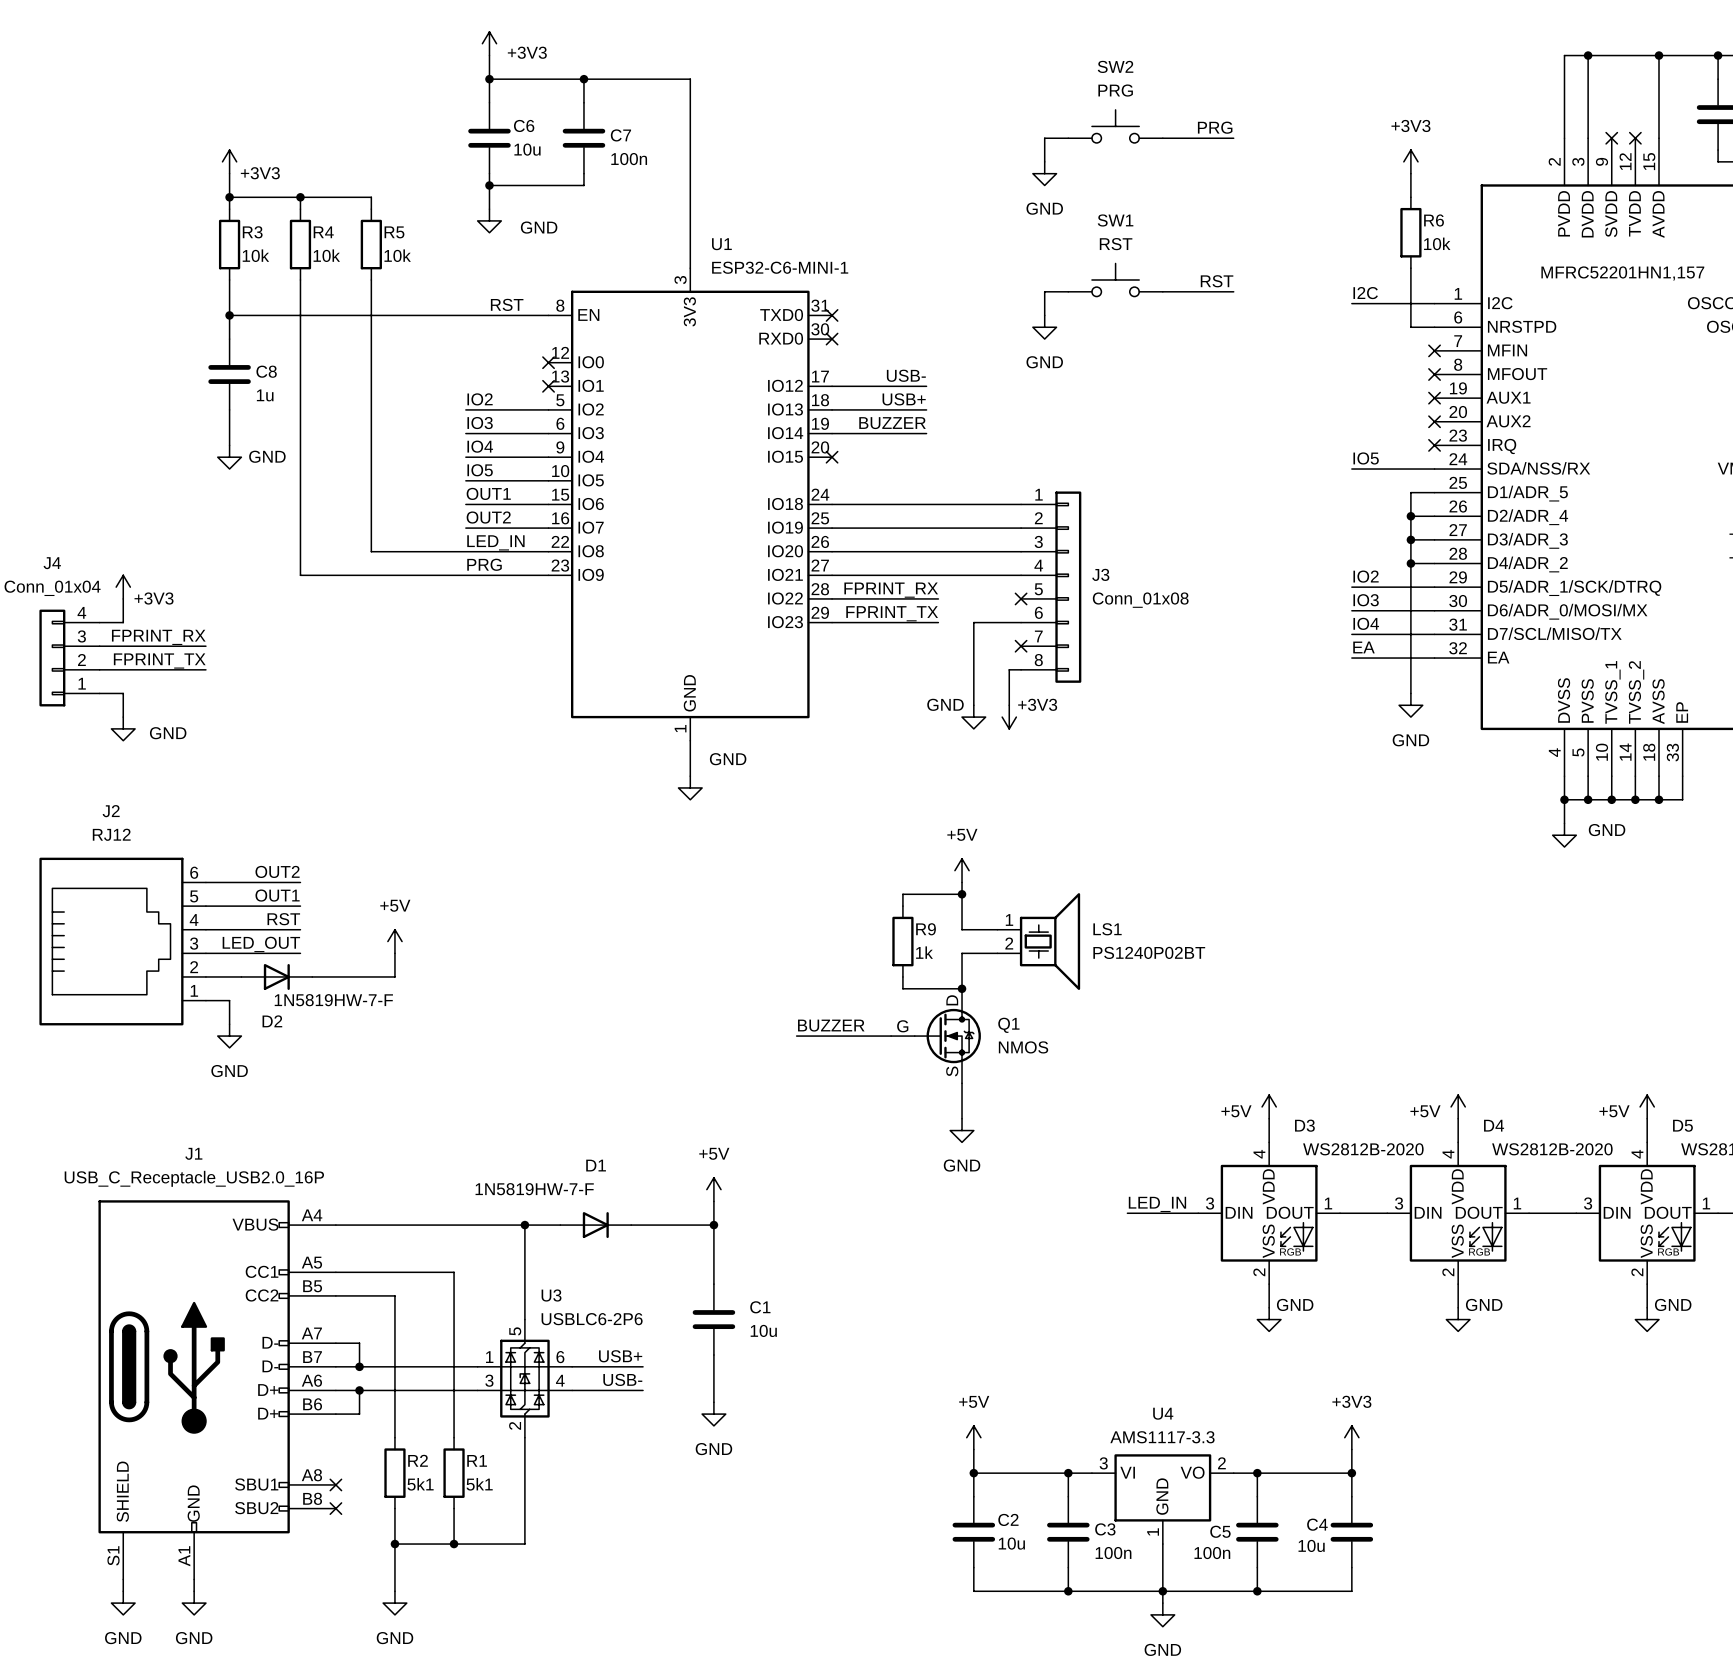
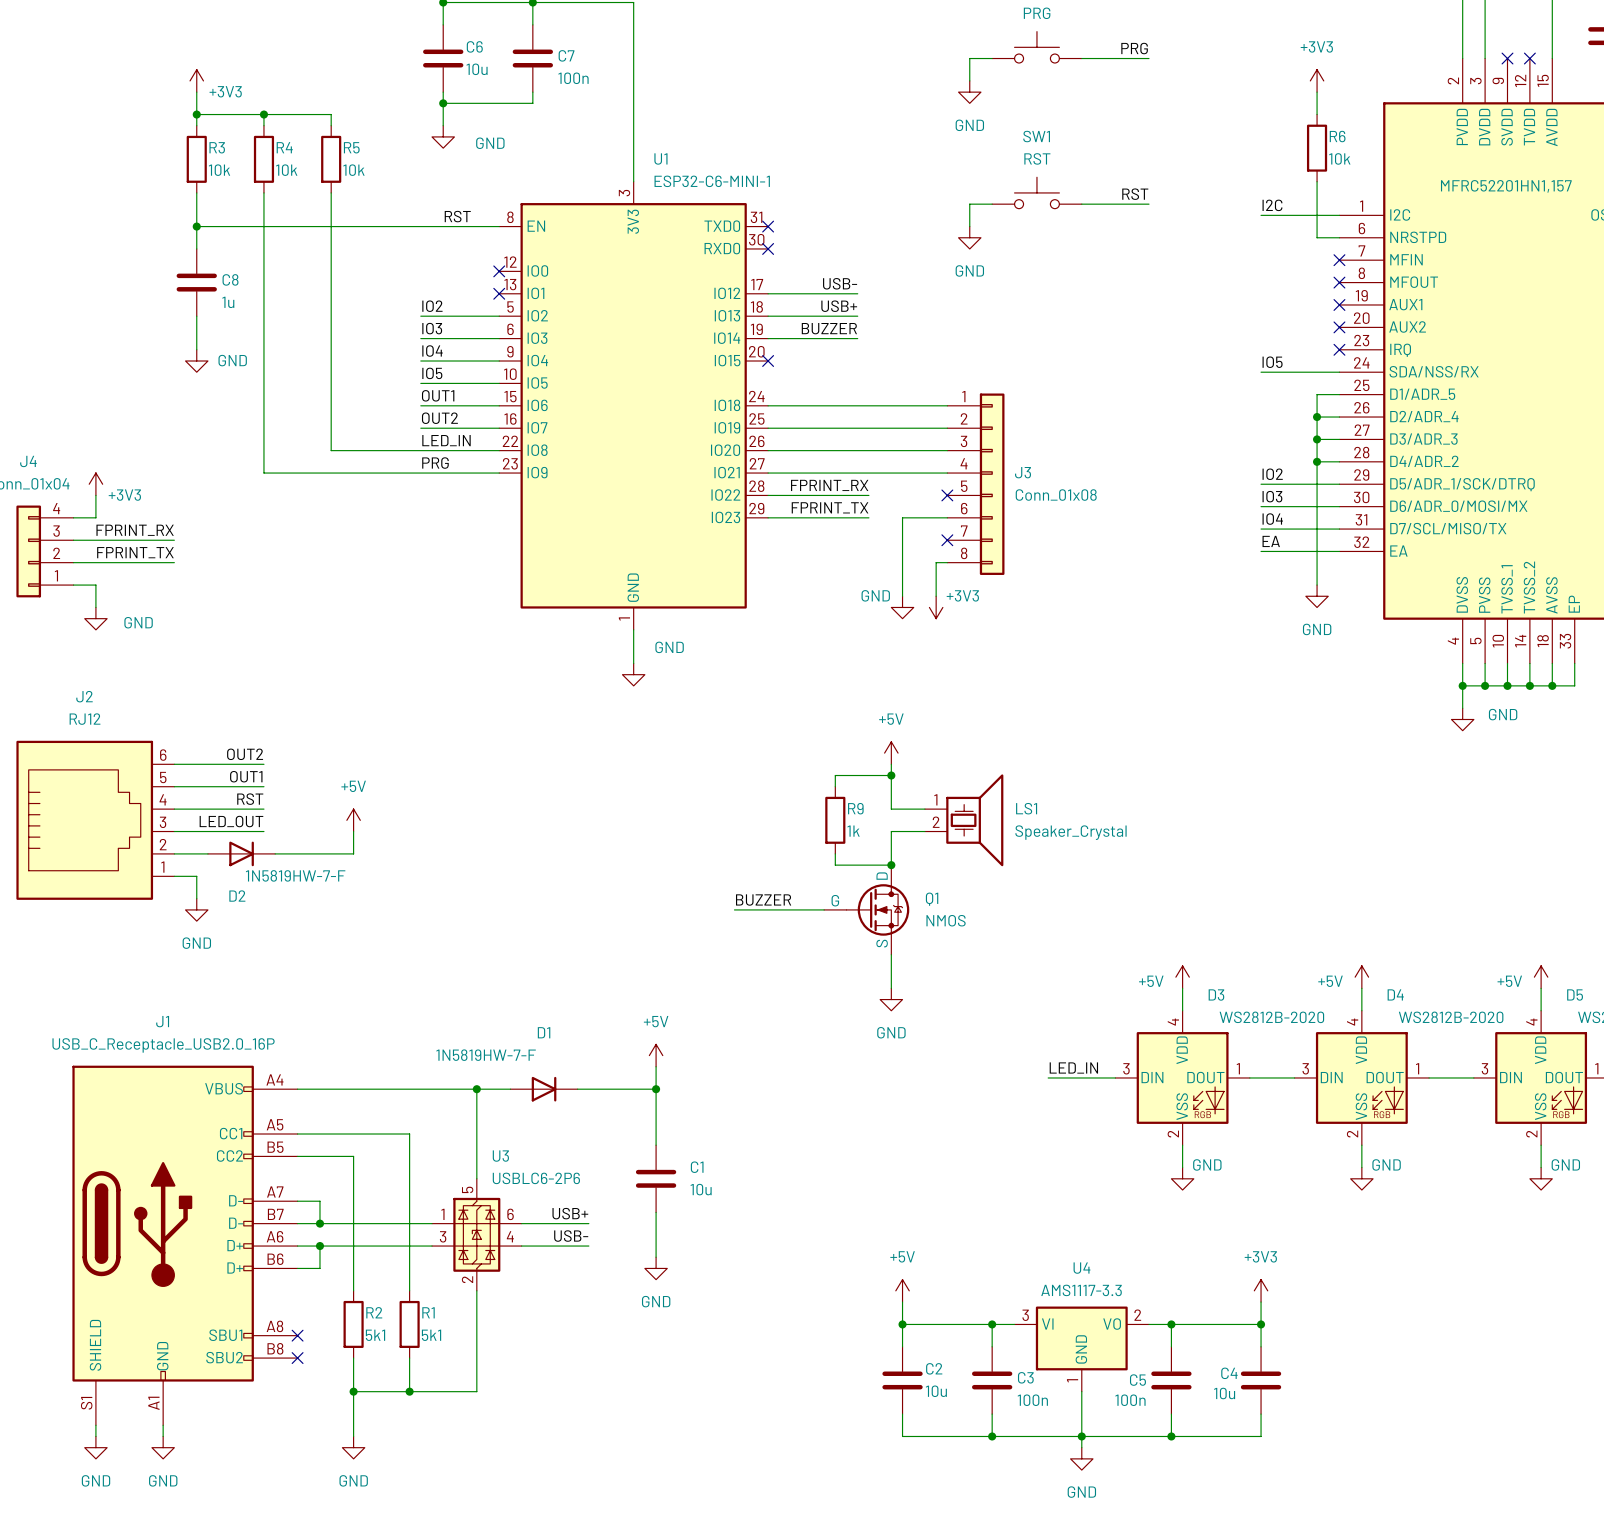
LS1 value: PS1240P02BT (1149, 952) -> Speaker_Crystal (1071, 832)

